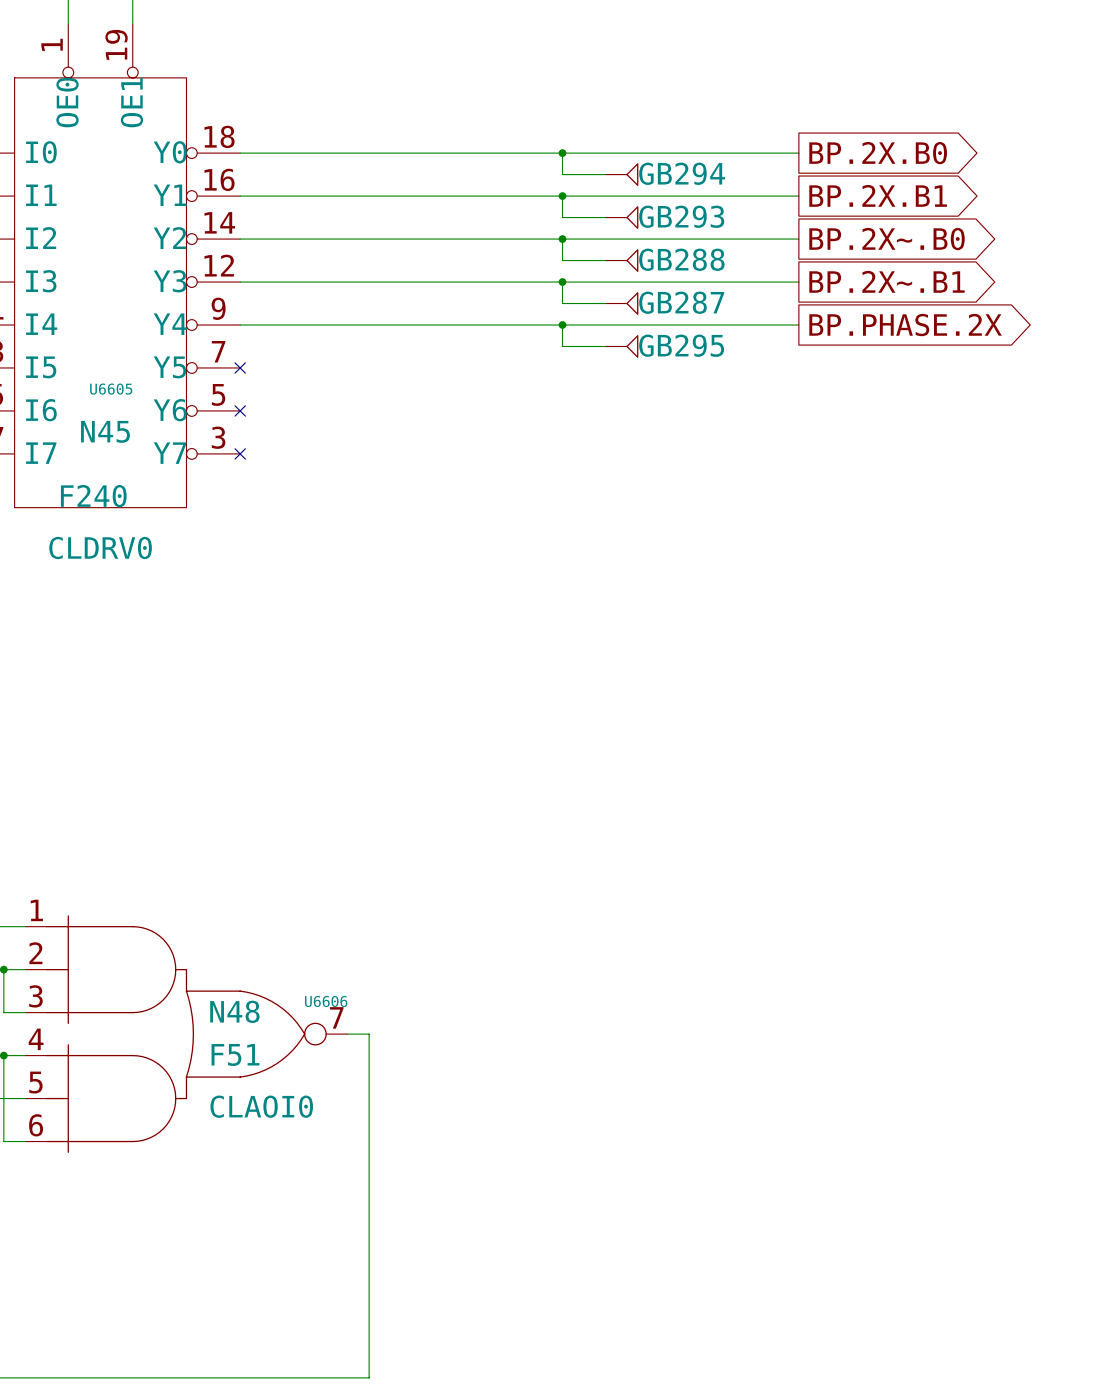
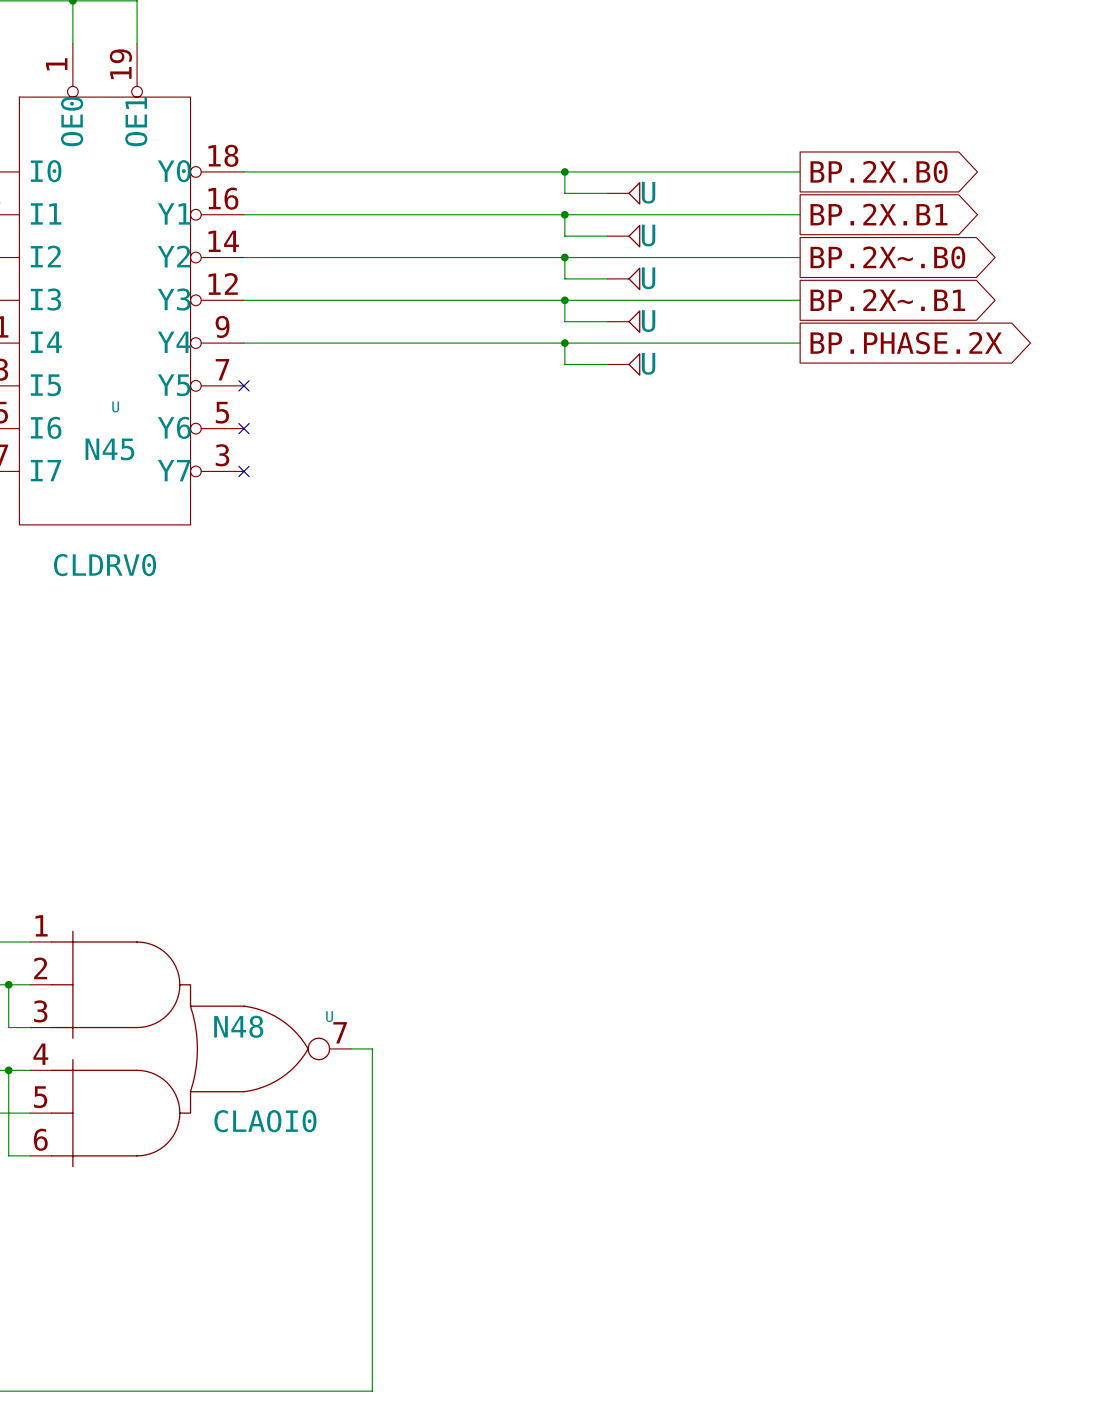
GB294 name: GB294 (682, 173) -> U (648, 192)
GB293 name: GB293 (681, 216) -> U (648, 235)
GB288 name: GB288 (681, 259) -> U (648, 278)
GB287 name: GB287 (681, 302) -> U (648, 321)
GB295 name: GB295 (681, 345) -> U (648, 363)
U6605 name: U6605 (111, 389) -> U (115, 406)
U6605 value: F240 (93, 496) -> none
U6606 name: U6606 (326, 1001) -> U (329, 1016)
U6606 value: F51 (235, 1054) -> none

